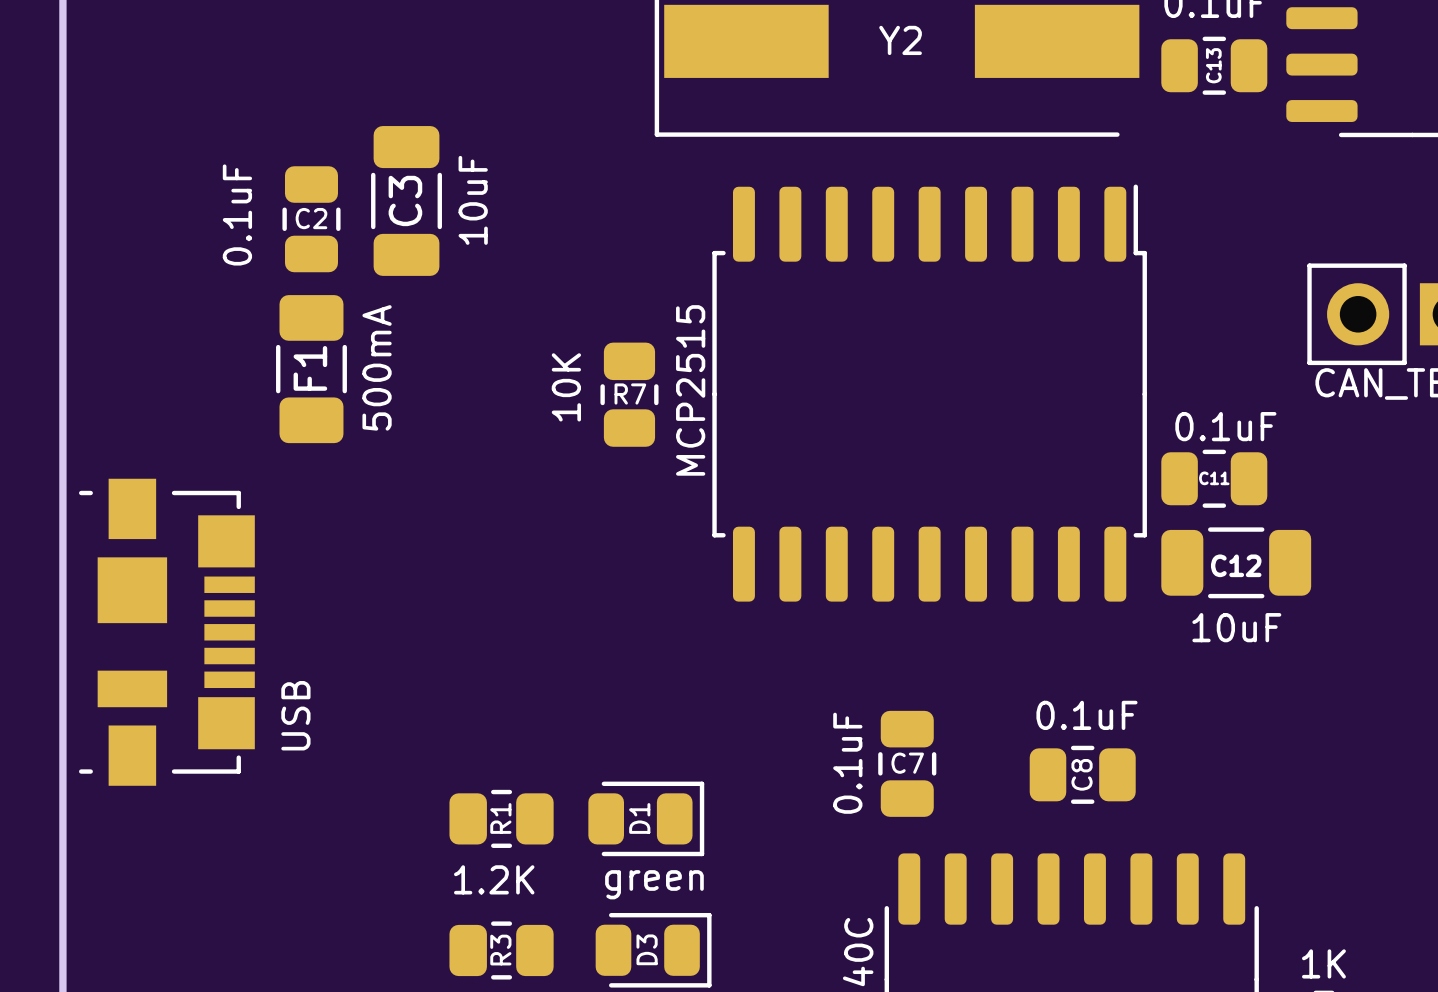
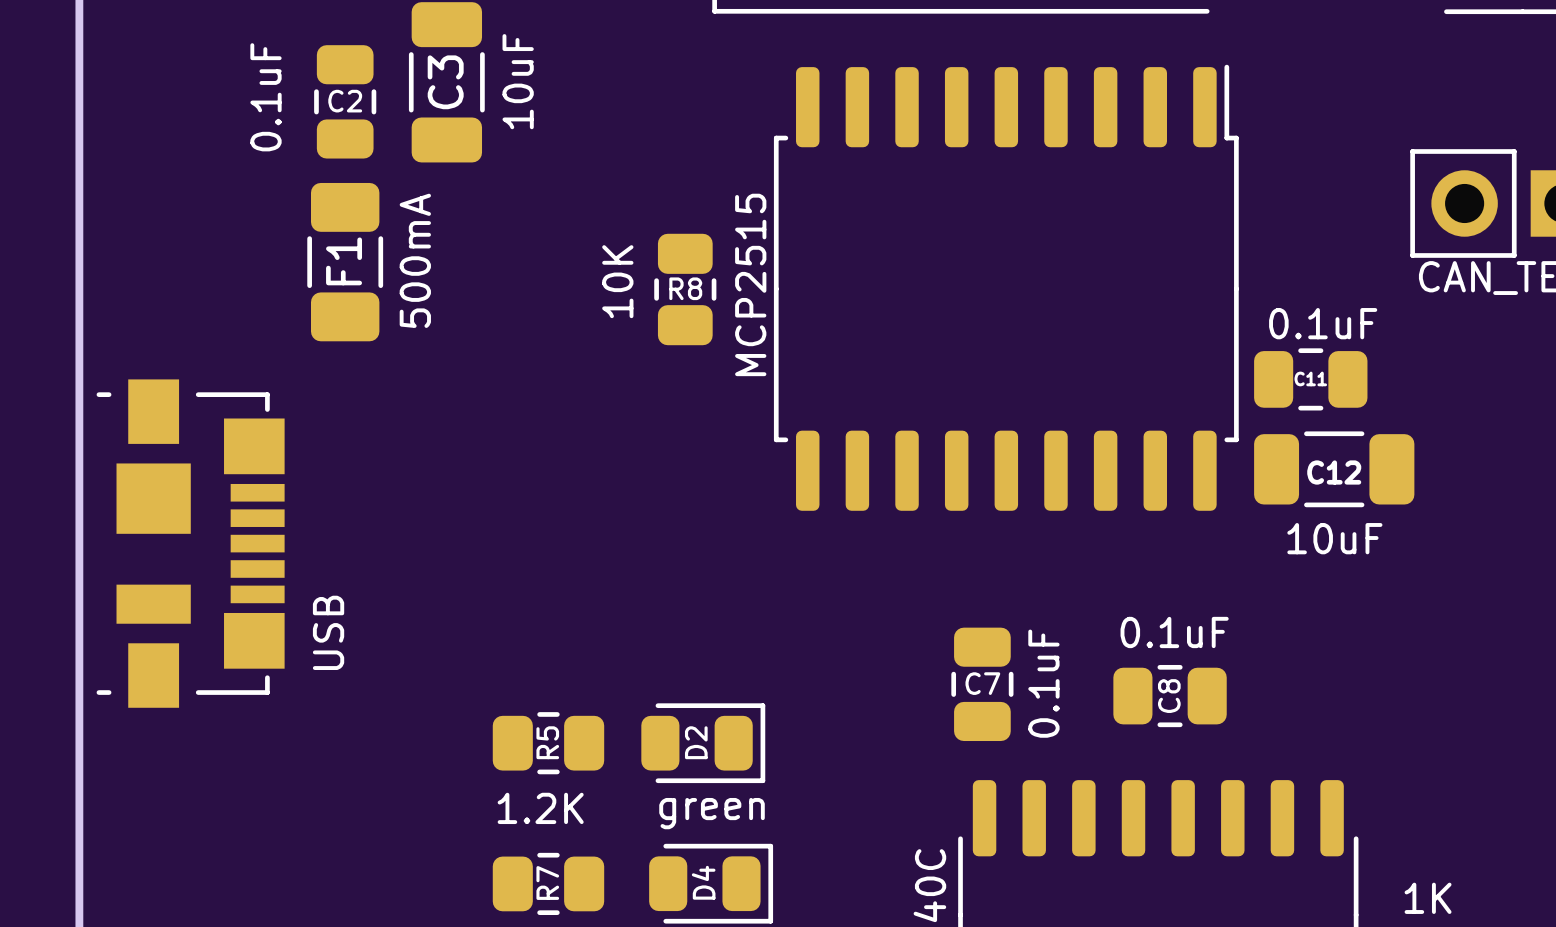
R7 name: R7 (630, 394) -> R8 (685, 288)
C7 value position: 0.1uF (847, 763) -> 0.1uF (1043, 683)
R1 name: R1 (500, 818) -> R5 (547, 742)
D1 name: D1 (639, 818) -> D2 (696, 742)
D3 name: D3 (647, 949) -> D4 (703, 882)
R3 name: R3 (500, 950) -> R7 (547, 883)

